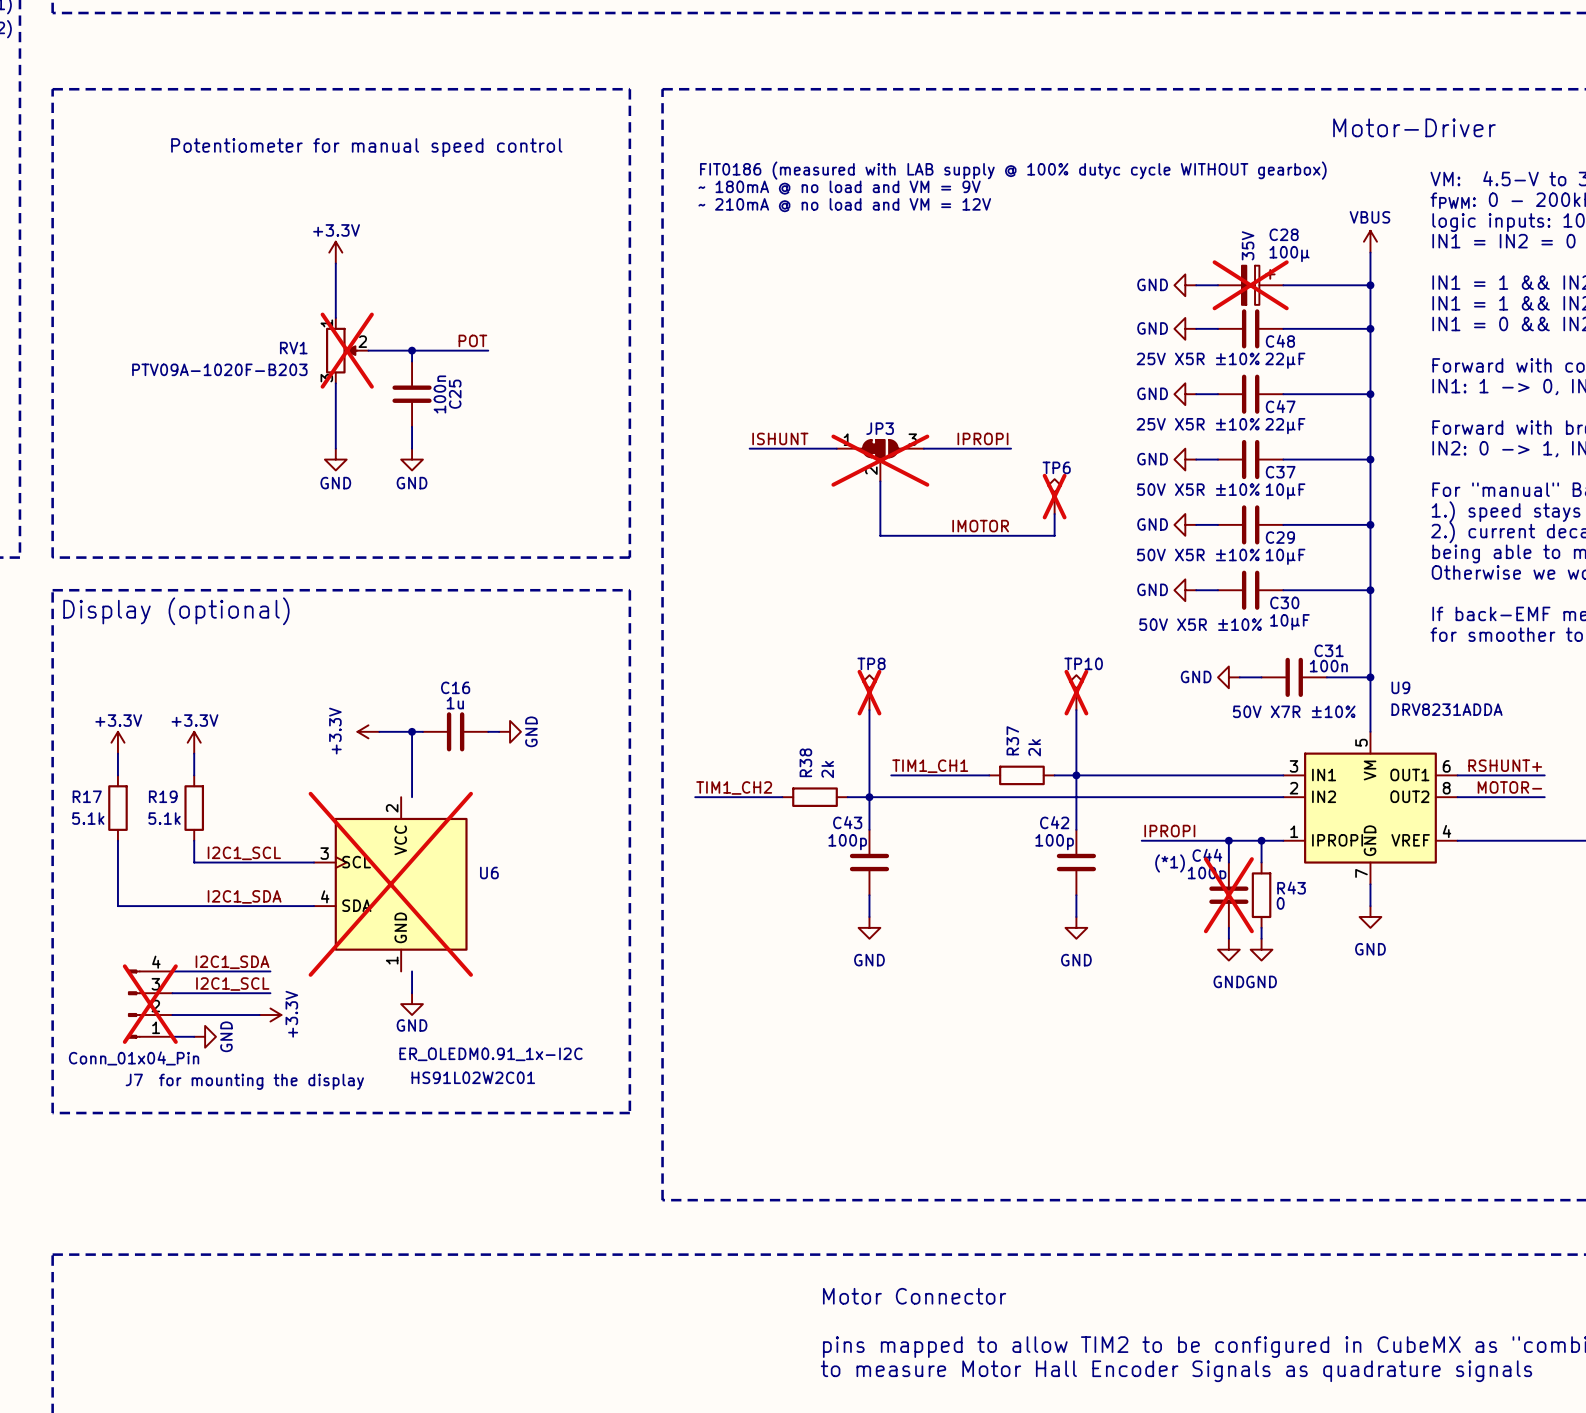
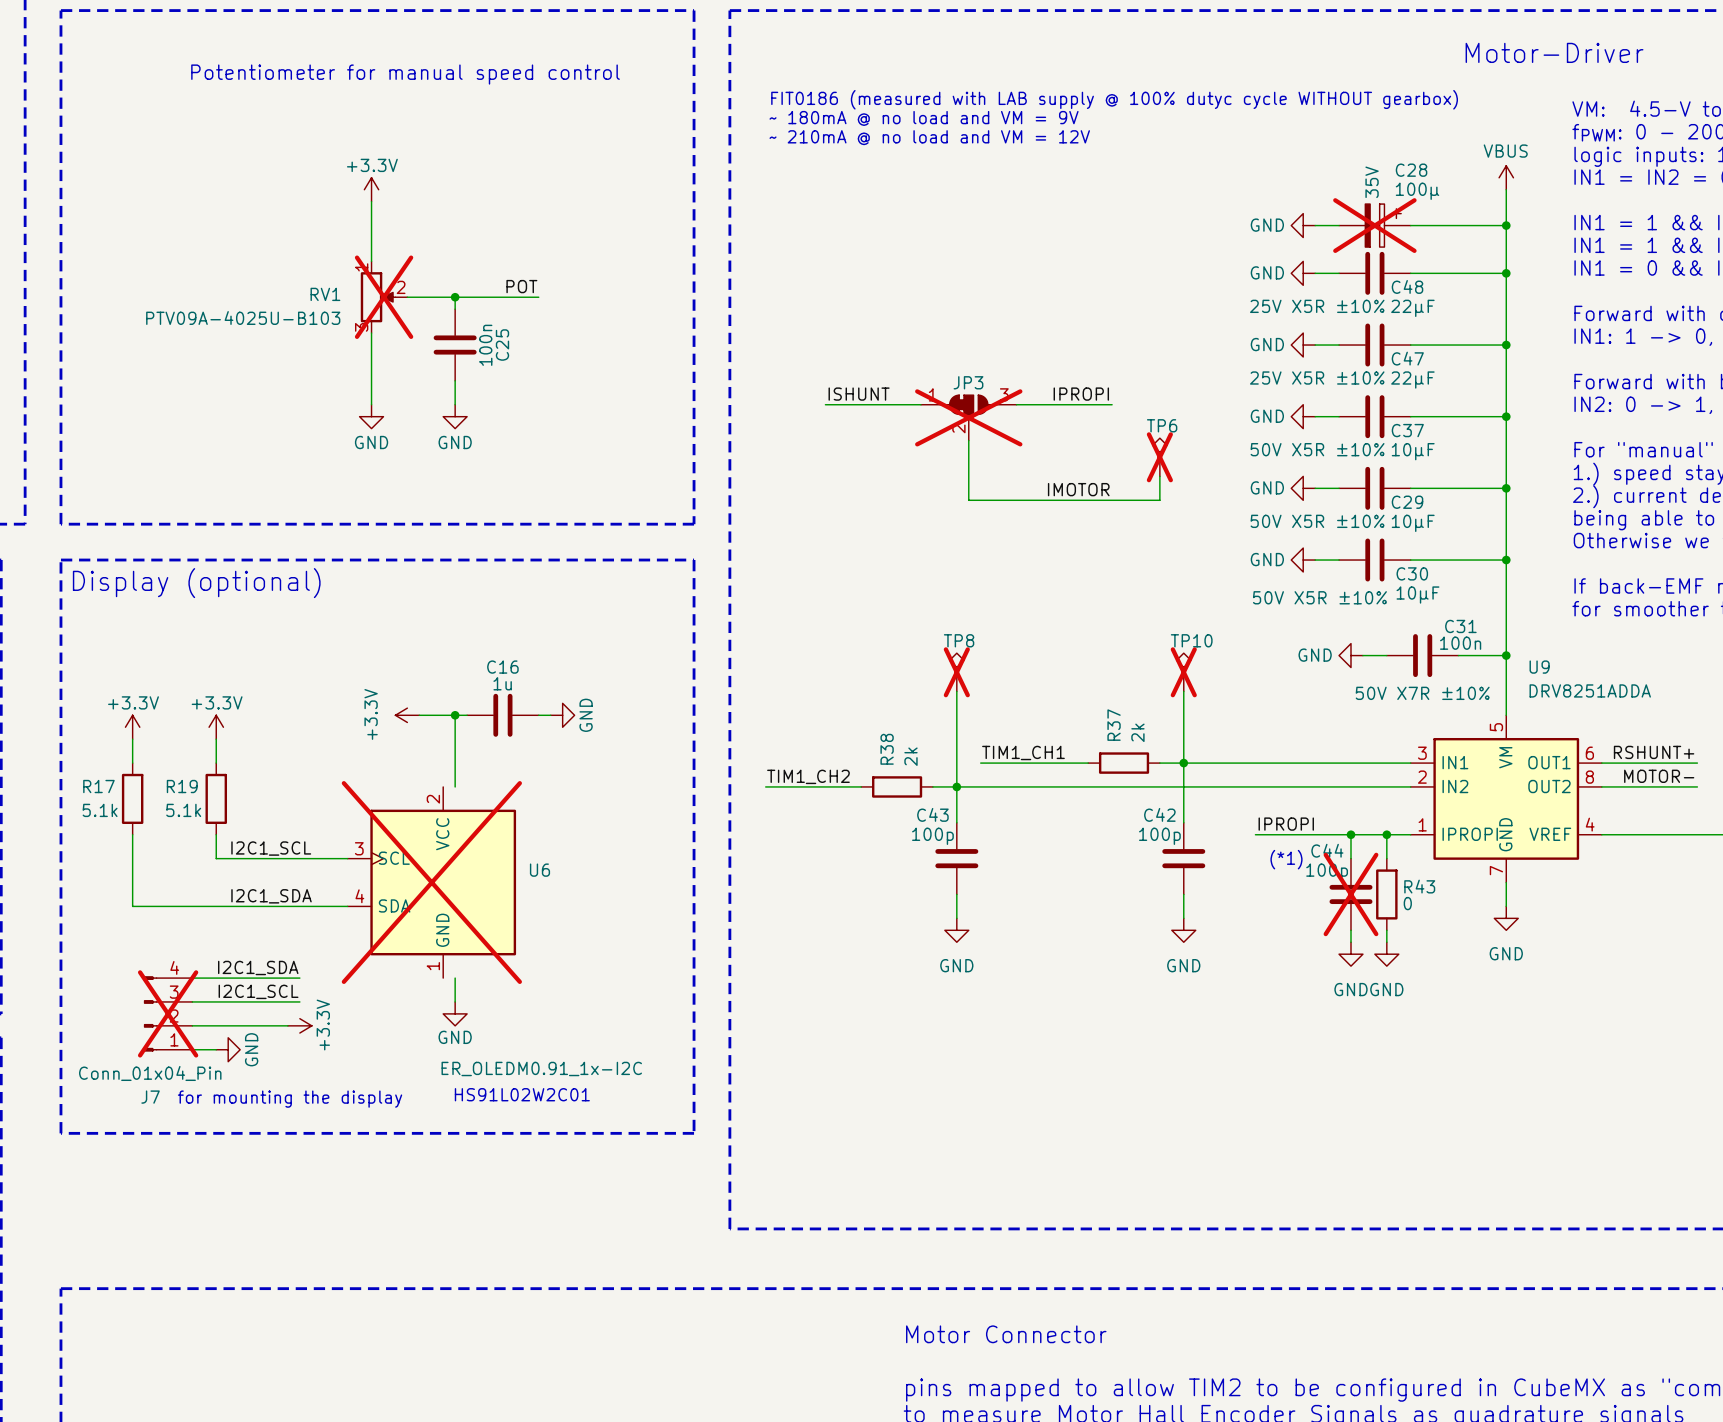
RV1 value: PTV09A-1020F-B203 (219, 369) -> PTV09A-4025U-B103 (243, 318)
U9 value: DRV8231ADDA (1447, 709) -> DRV8251ADDA (1590, 690)

